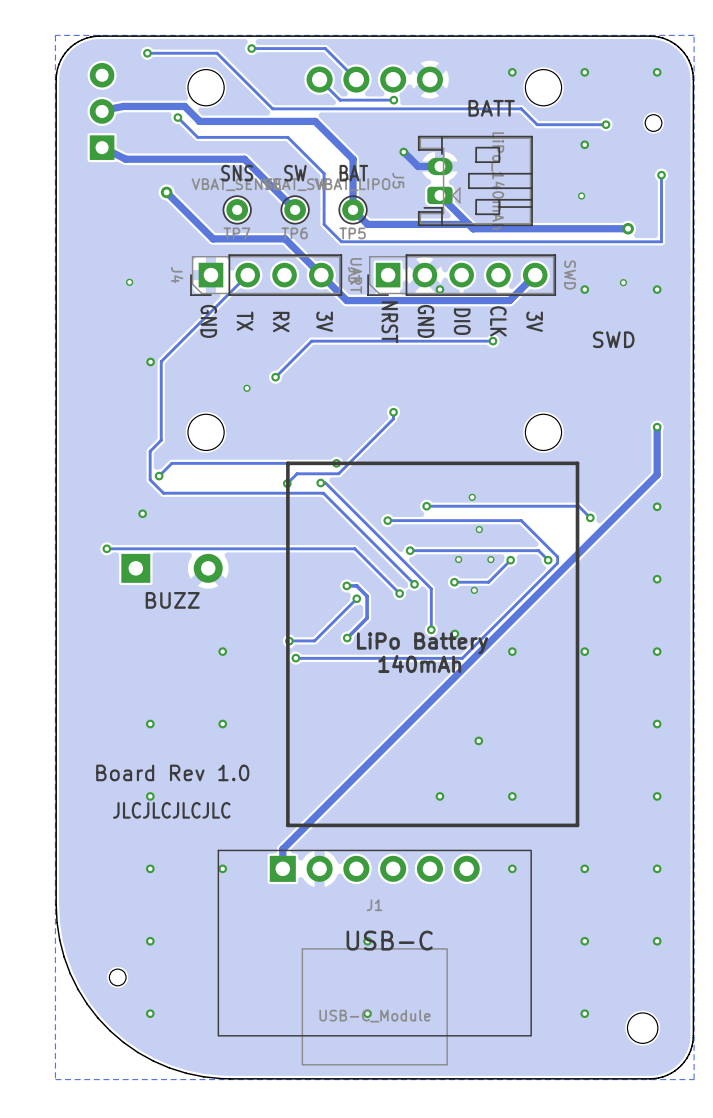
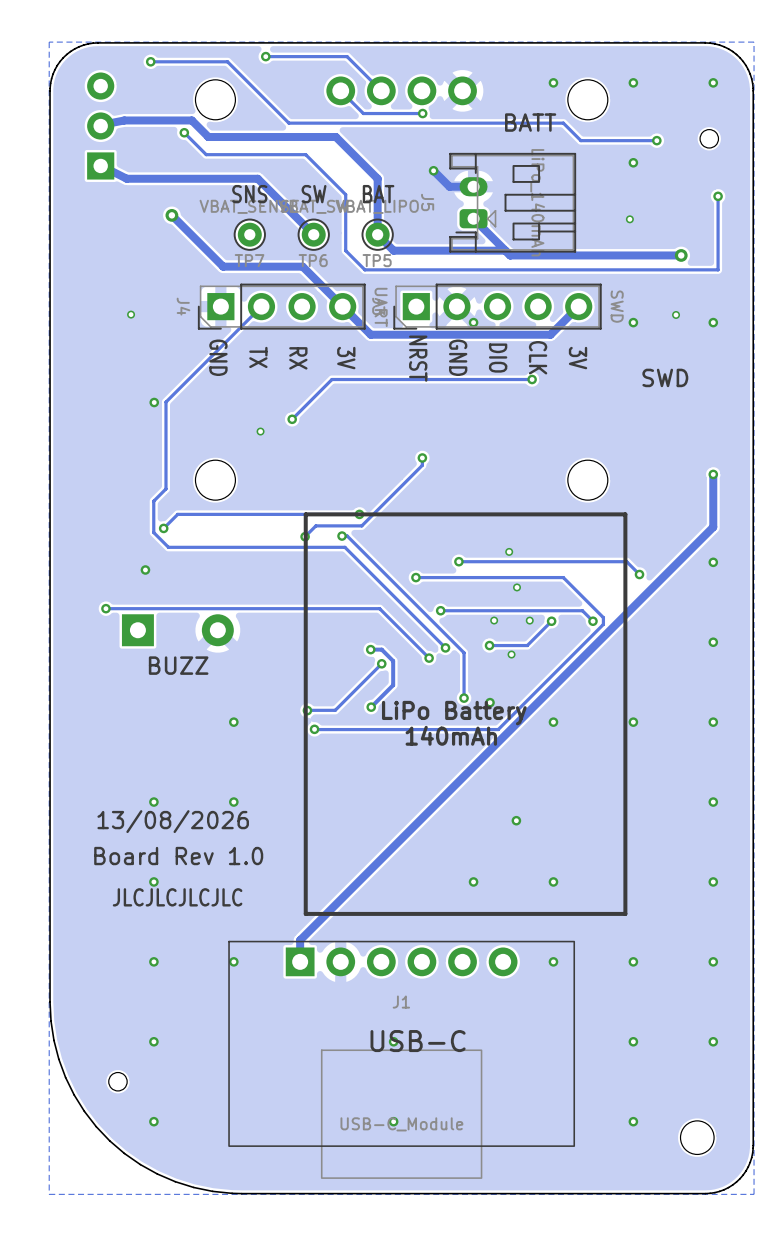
text: none -> 13/08/2026 (173, 821)

